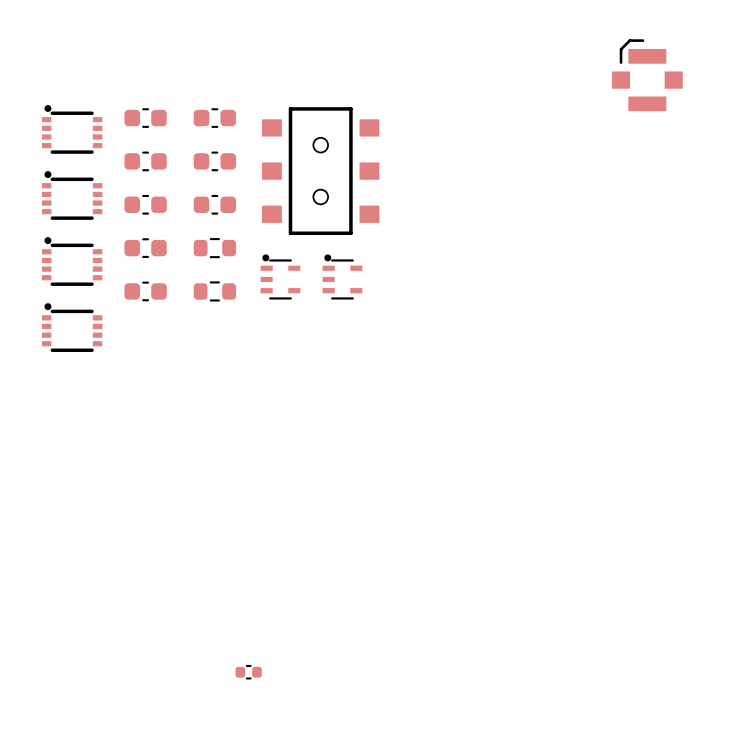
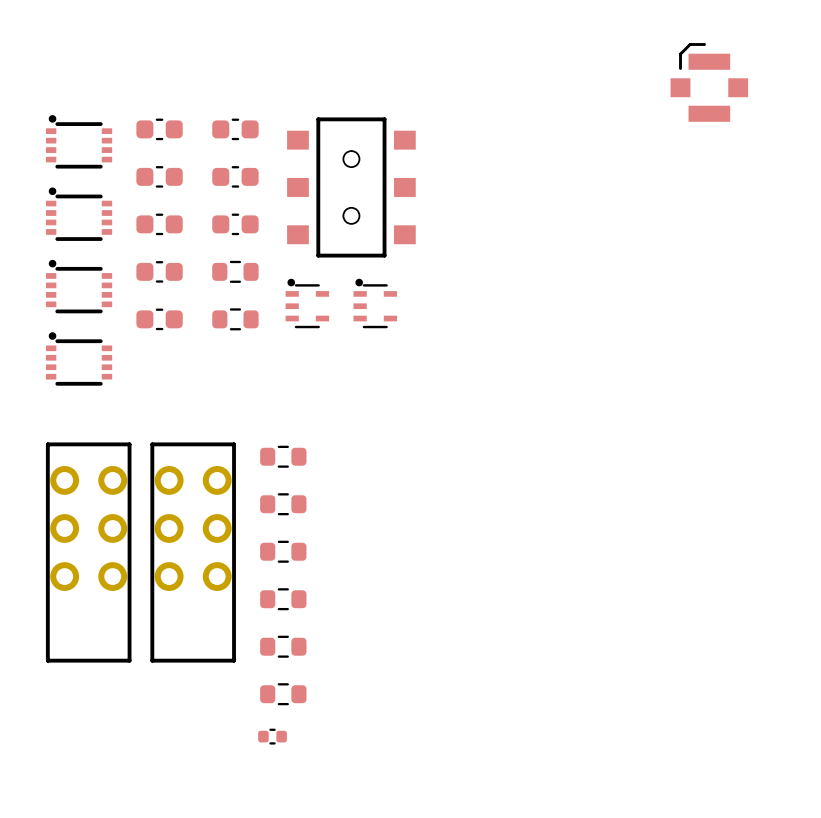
part: none -> (283, 456)
part: none -> (283, 504)
part: none -> (283, 551)
part: none -> (88, 552)
part: none -> (193, 552)
part: none -> (283, 599)
part: none -> (283, 646)
part: none -> (283, 694)

